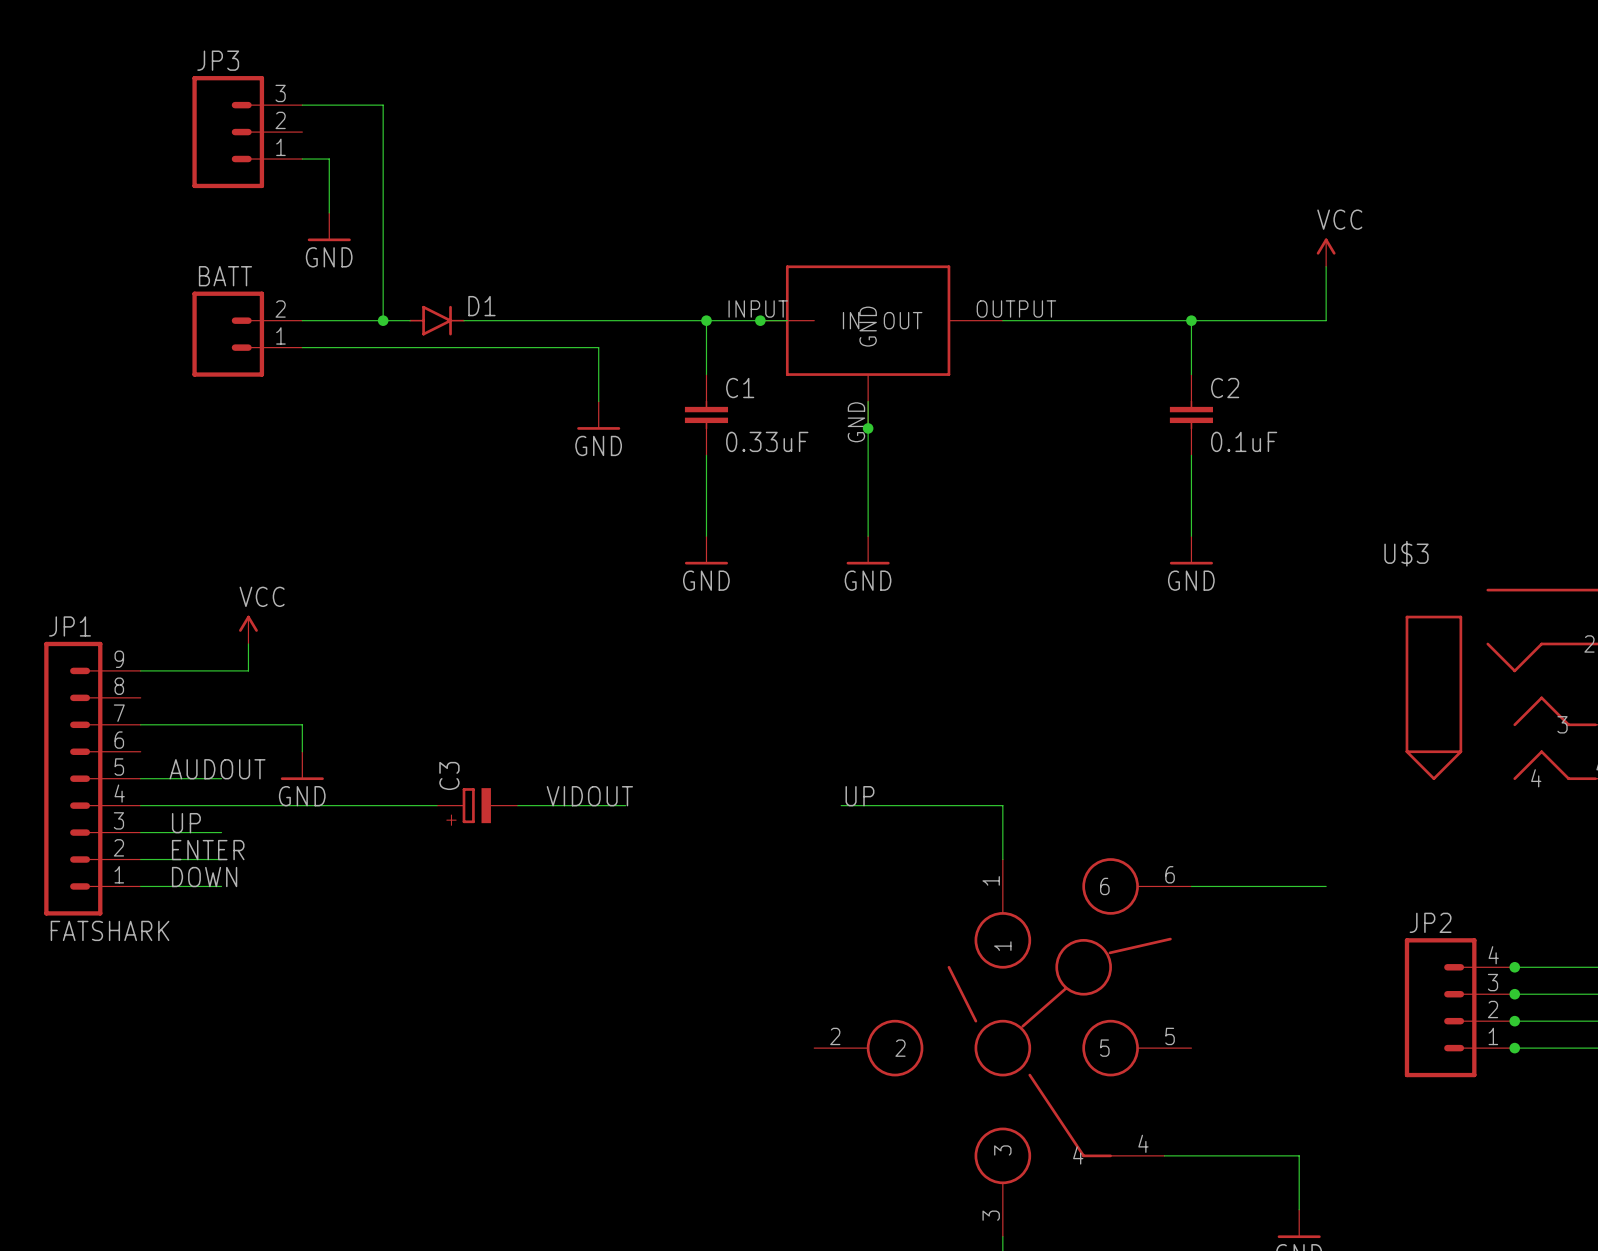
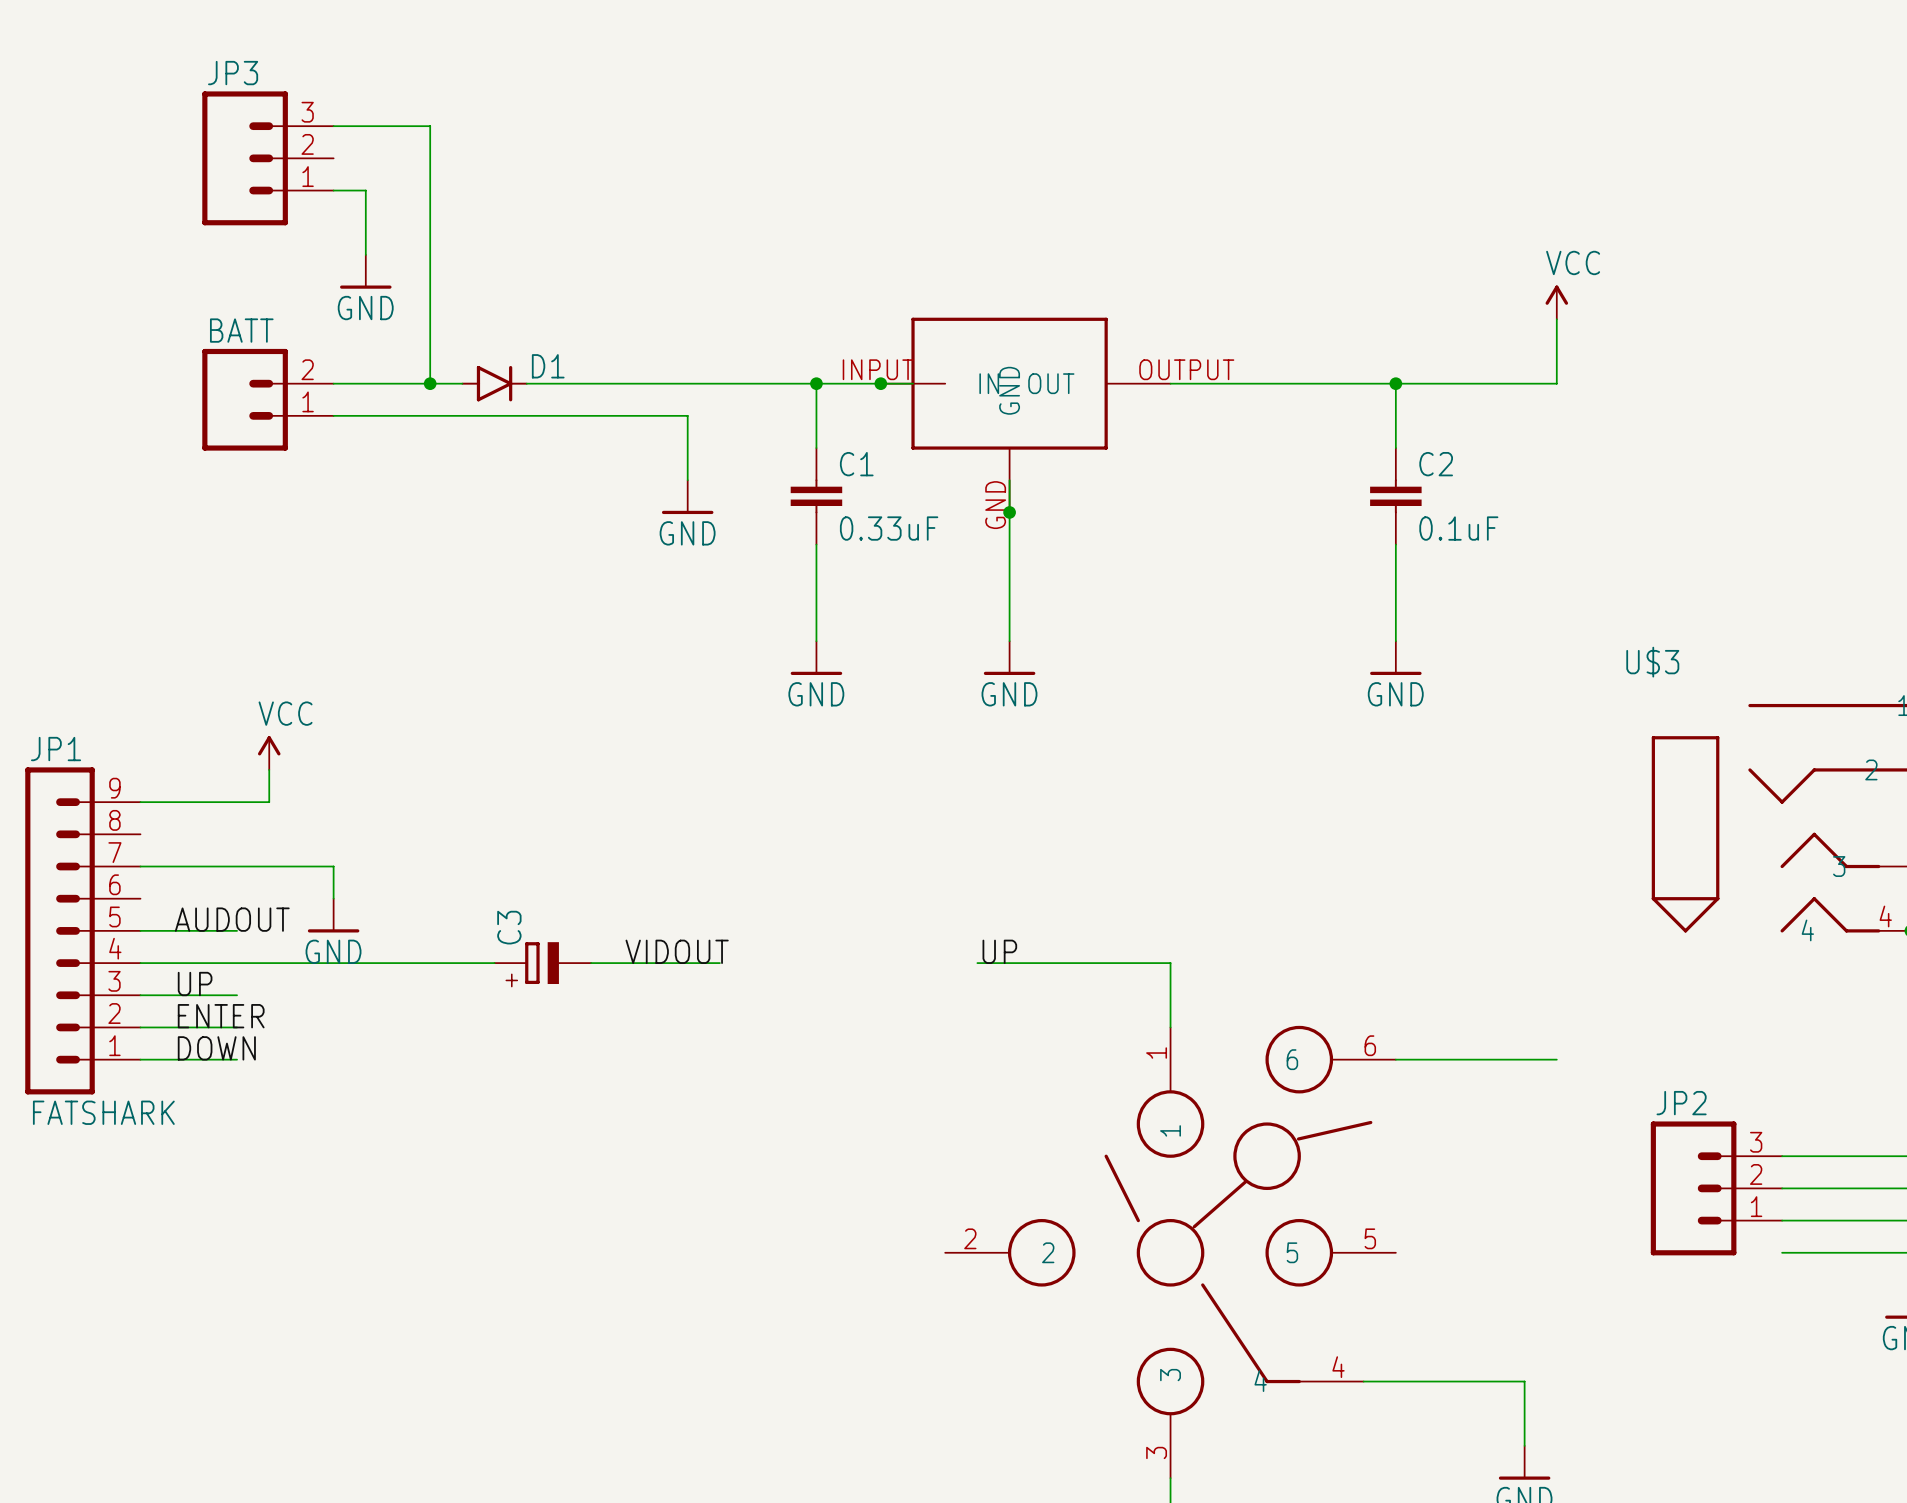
JP2 symbol: [1404, 938, 1515, 1078] -> [1650, 1121, 1783, 1256]
junction: (1514, 967) -> none
junction: (1514, 994) -> none
junction: (1514, 1021) -> none
junction: (1514, 1048) -> none

